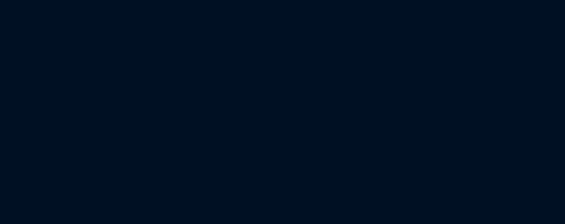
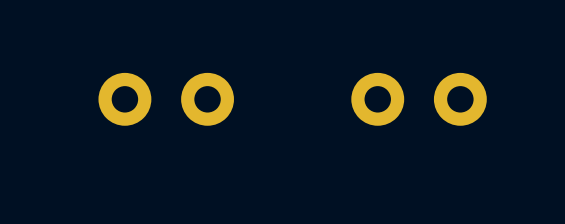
part: none -> (166, 99)
part: none -> (419, 99)

